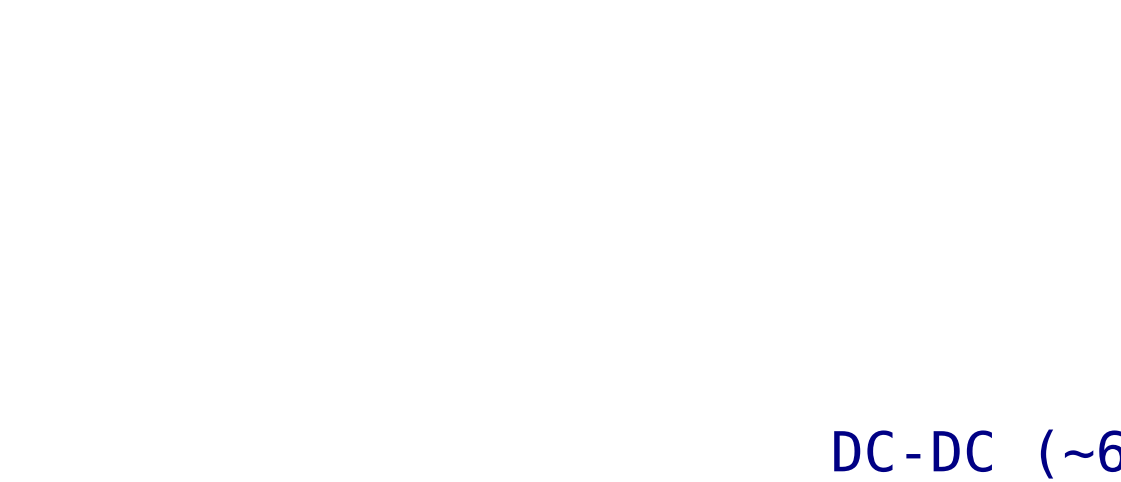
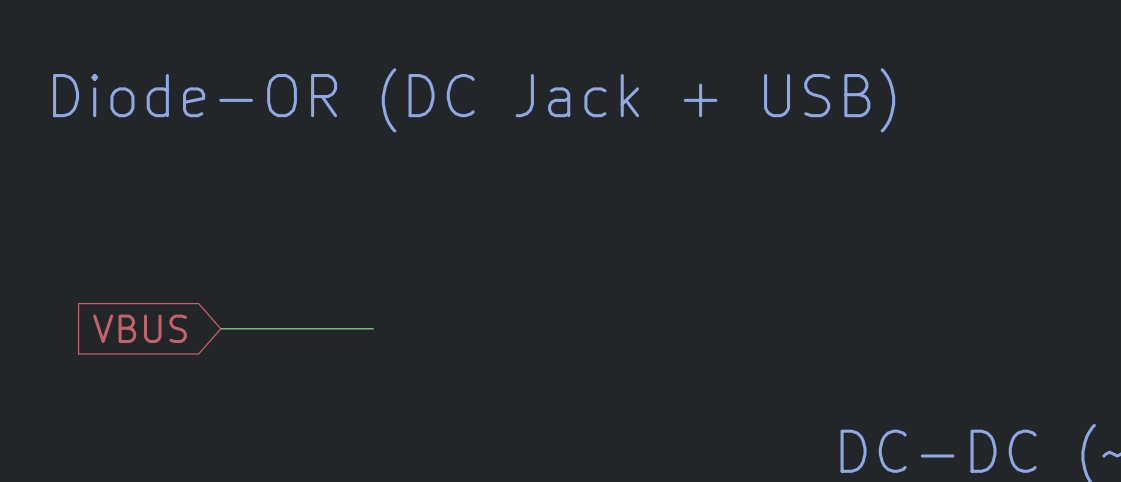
text: none -> Diode-OR (DC Jack + USB) (474, 100)
global label: none -> VBUS (140, 328)
wire: none -> (220, 328) (373, 328)

